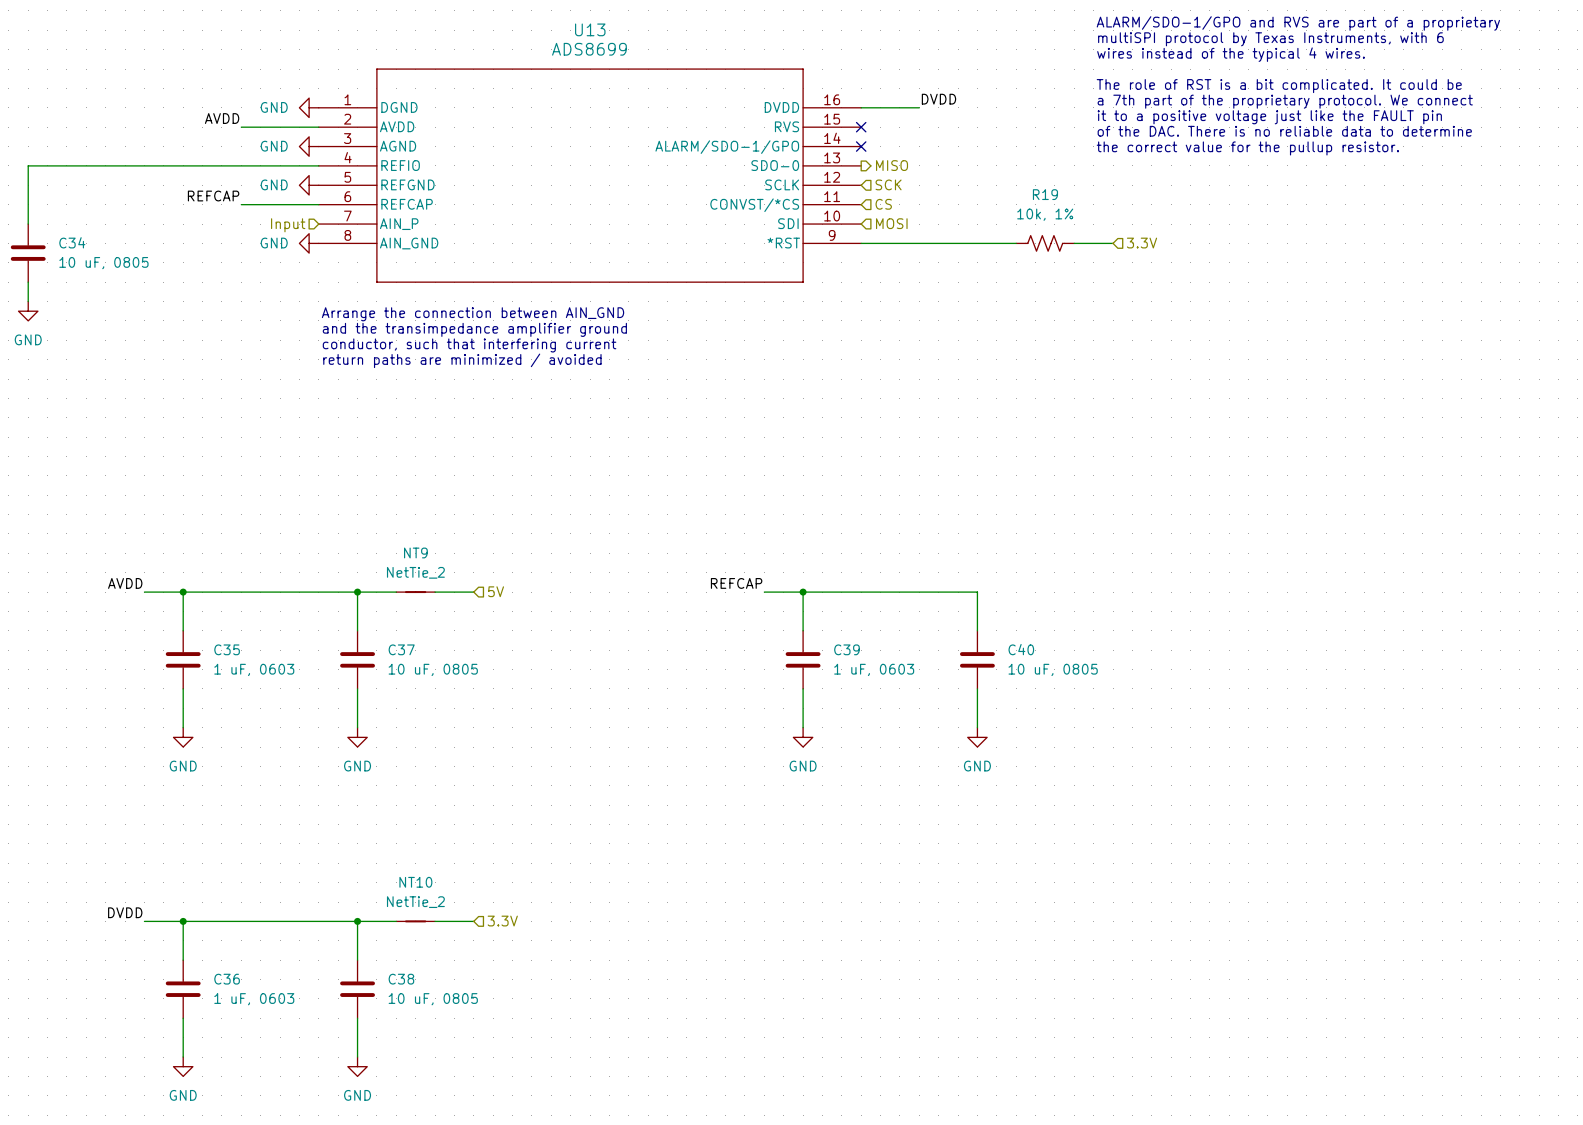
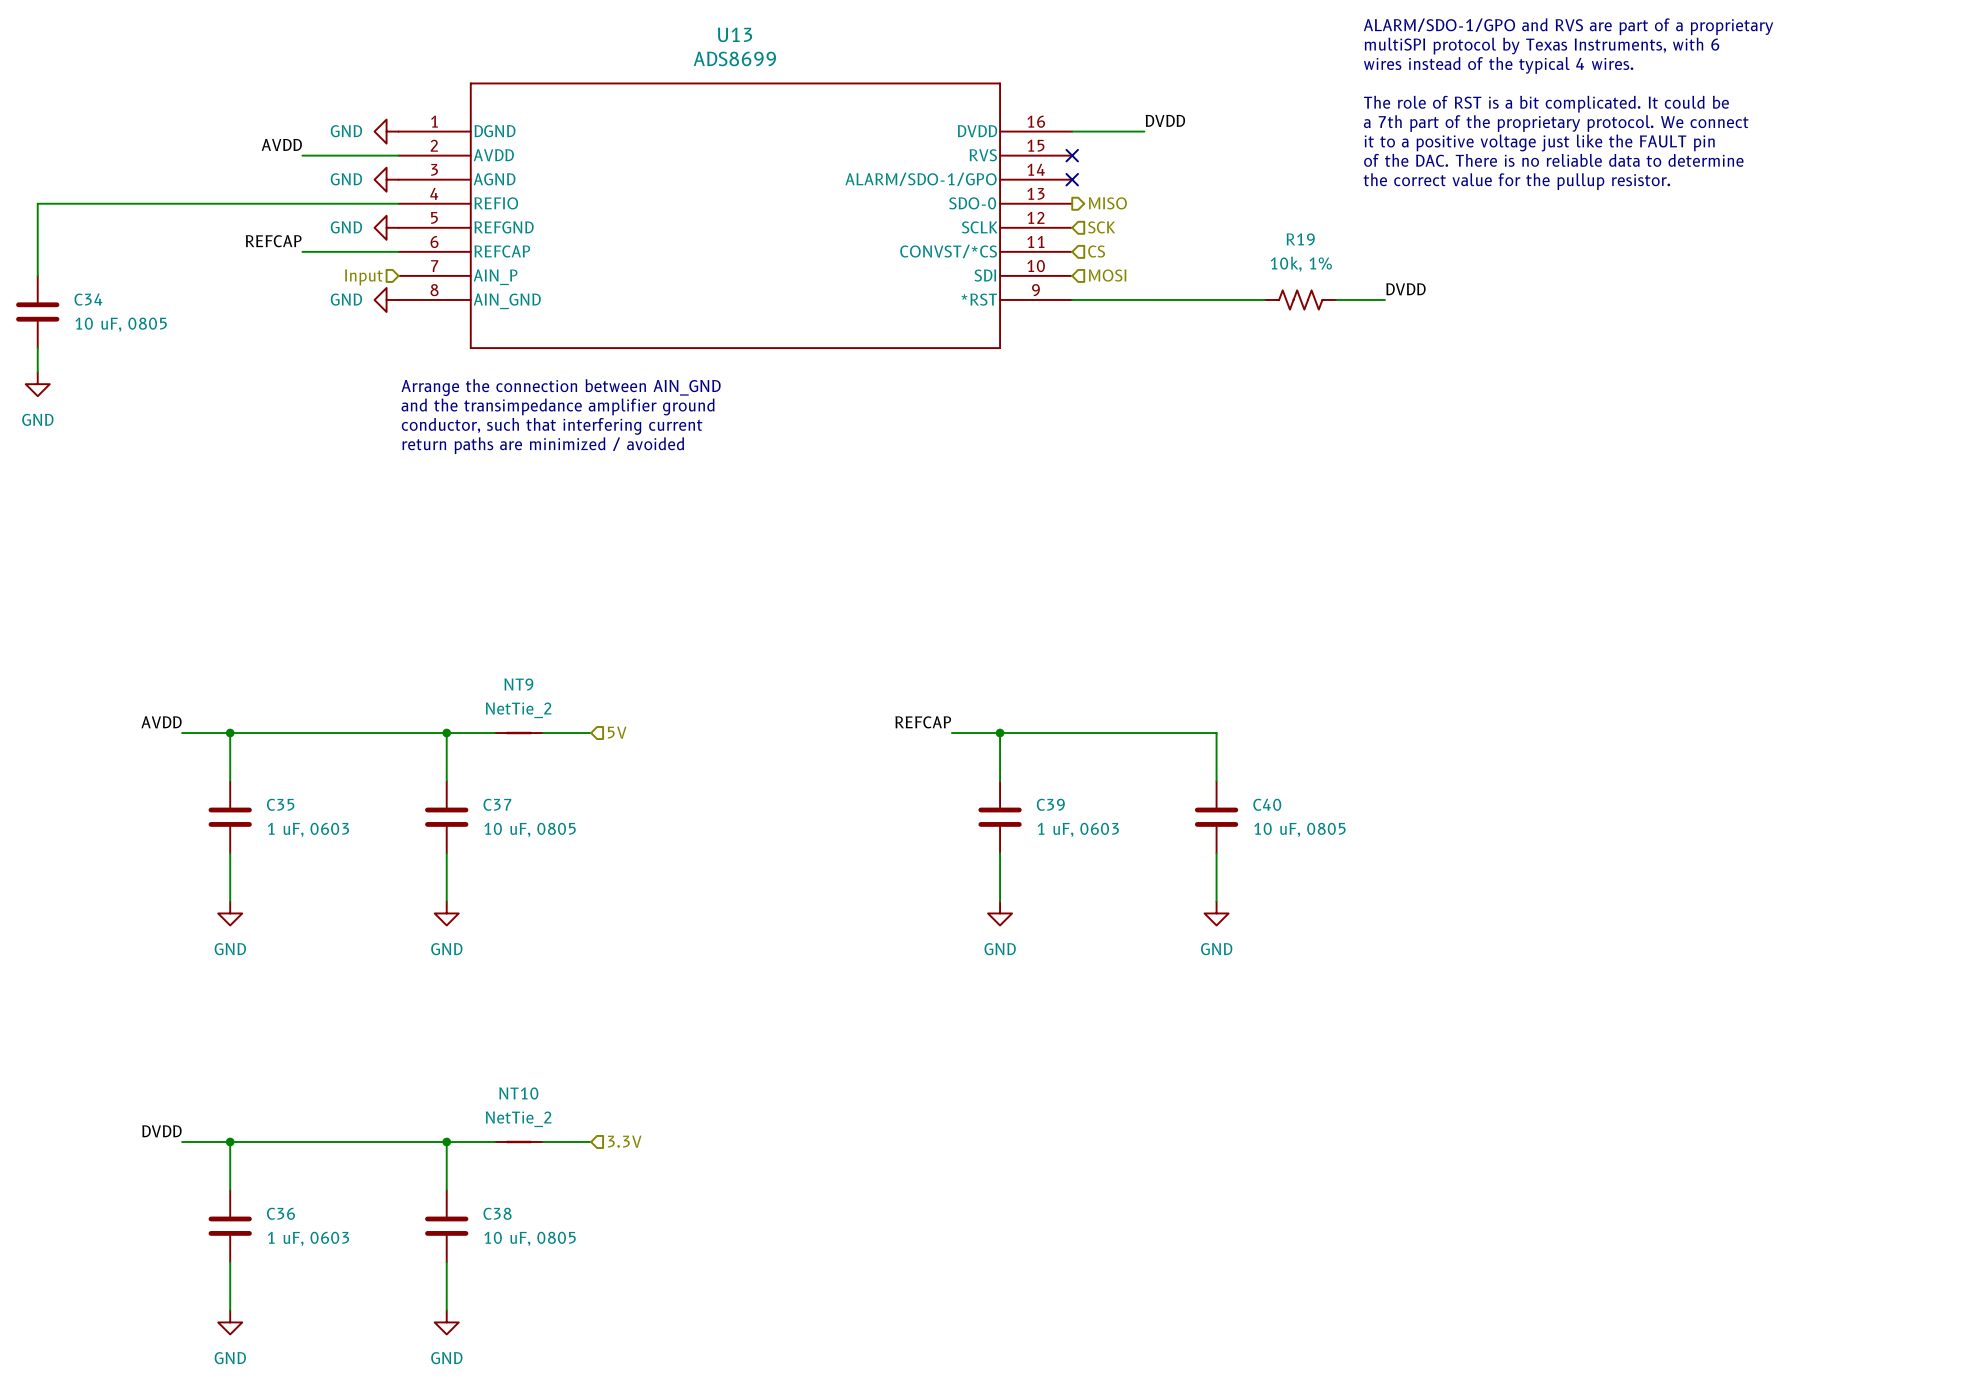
label: none -> DVDD (1405, 289)
hierarchical label: 3.3V (1142, 243) -> none

